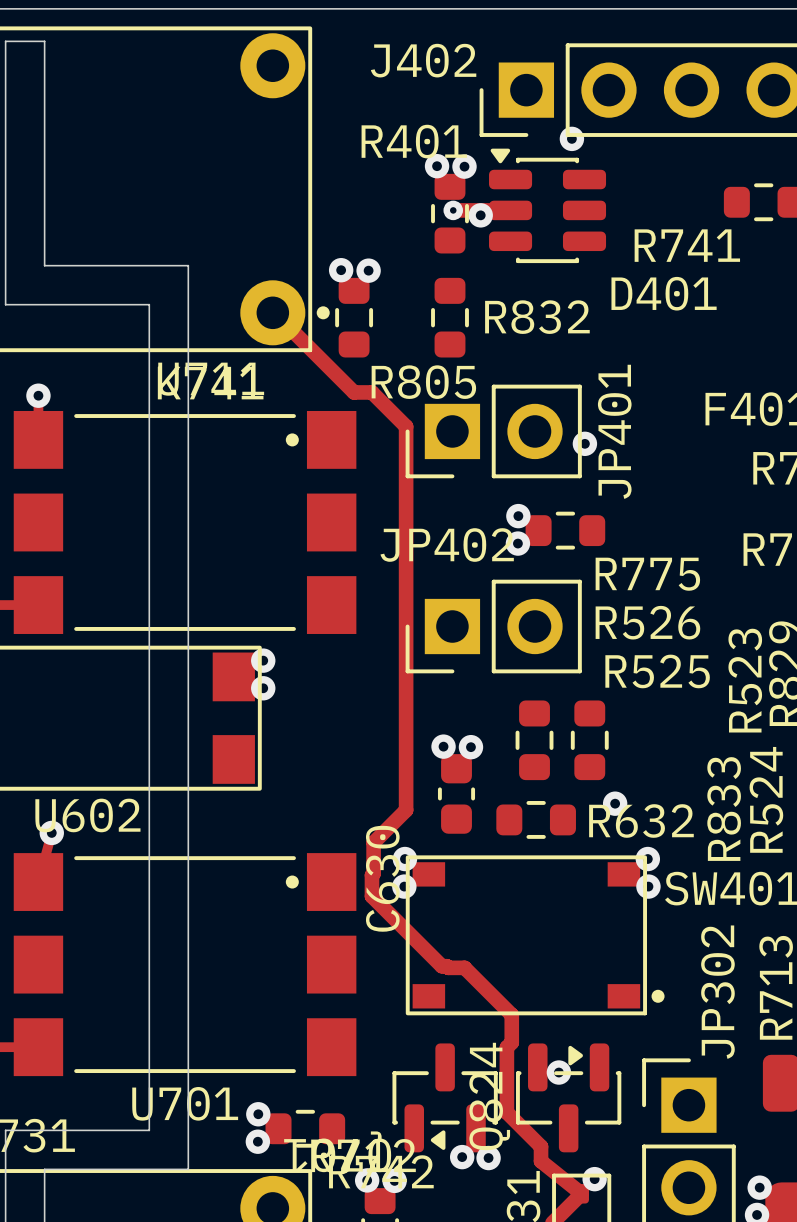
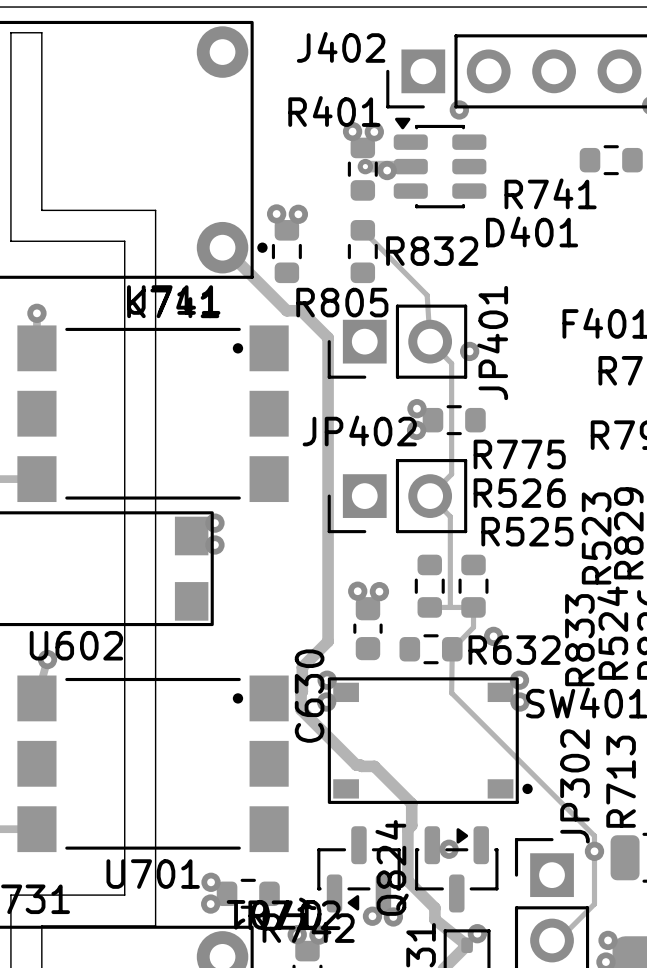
track: none -> (362, 230) (427, 295) (430, 341) (451, 363) (451, 474) (430, 496) (450, 516) (450, 606)
track: none -> (429, 607) (473, 607) (473, 627) (452, 649) (451, 693) (594, 835) (594, 904) (561, 937) (552, 940)
via: none -> (594, 851)

